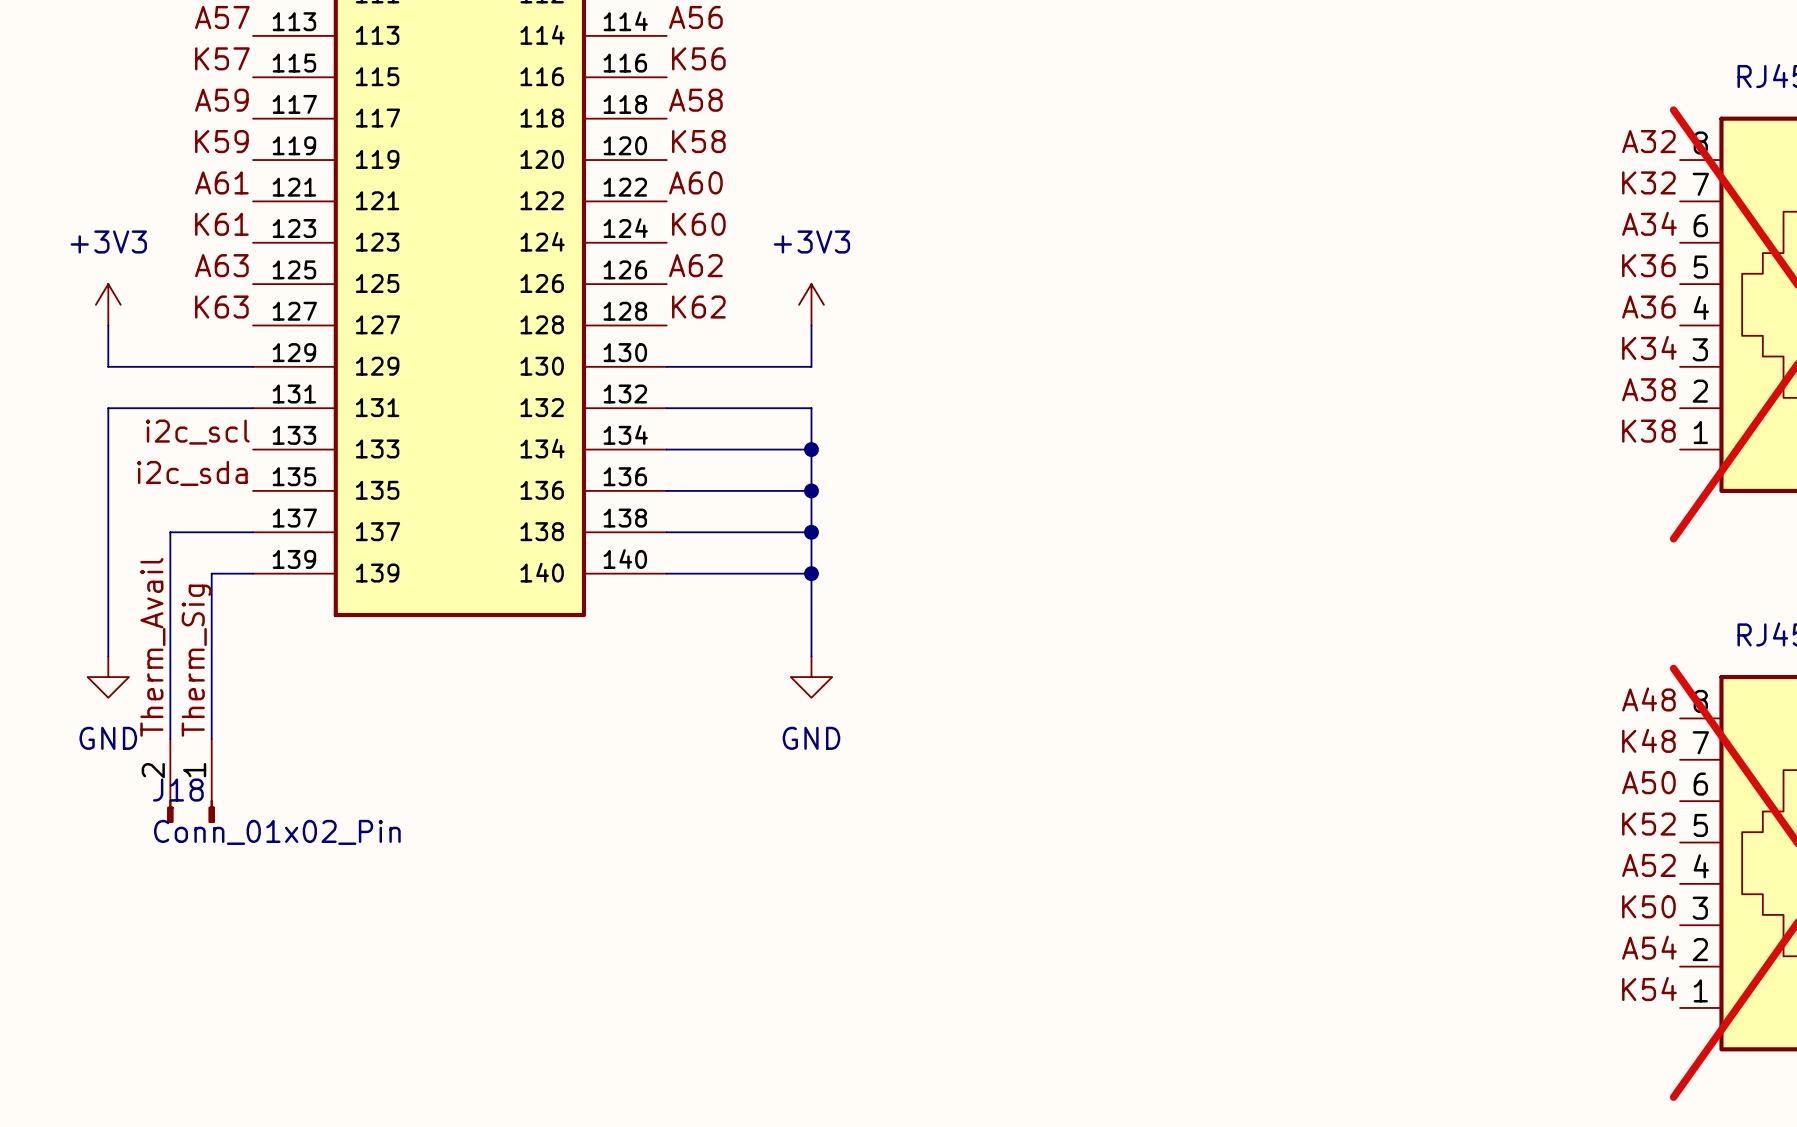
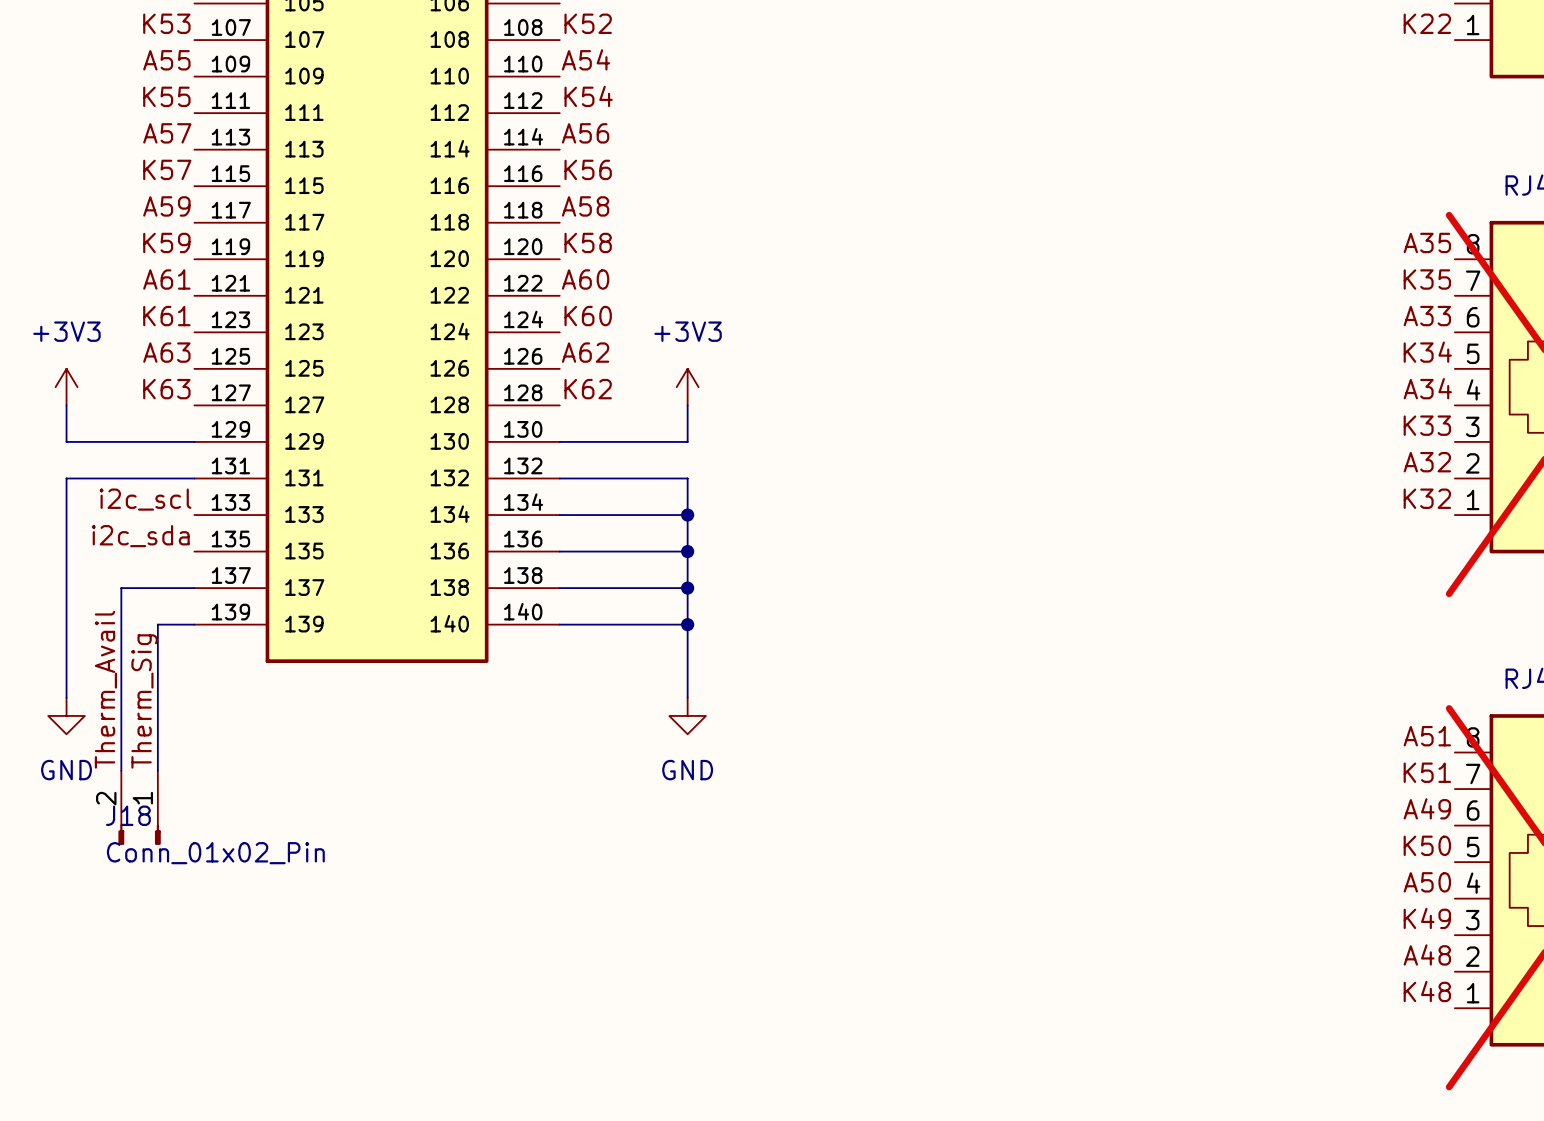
label: A32 (1648, 141) -> A35 (1427, 242)
label: K32 (1648, 182) -> K35 (1427, 279)
label: A34 (1649, 223) -> A33 (1427, 316)
label: K36 (1648, 265) -> K34 (1427, 352)
label: A36 (1648, 307) -> A34 (1427, 388)
label: K34 (1649, 347) -> K33 (1427, 425)
label: A38 (1648, 389) -> A32 (1427, 462)
label: K38 (1648, 431) -> K32 (1427, 498)
label: A48 (1648, 699) -> A51 (1427, 736)
label: K48 (1648, 740) -> K51 (1427, 772)
label: A50 (1648, 782) -> A49 (1427, 808)
label: K52 (1648, 824) -> K50 (1427, 845)
label: A52 (1648, 865) -> A50 (1427, 882)
label: K50 (1648, 906) -> K49 (1427, 918)
label: A54 (1649, 947) -> A48 (1427, 954)
label: K54 (1649, 989) -> K48 (1427, 991)

